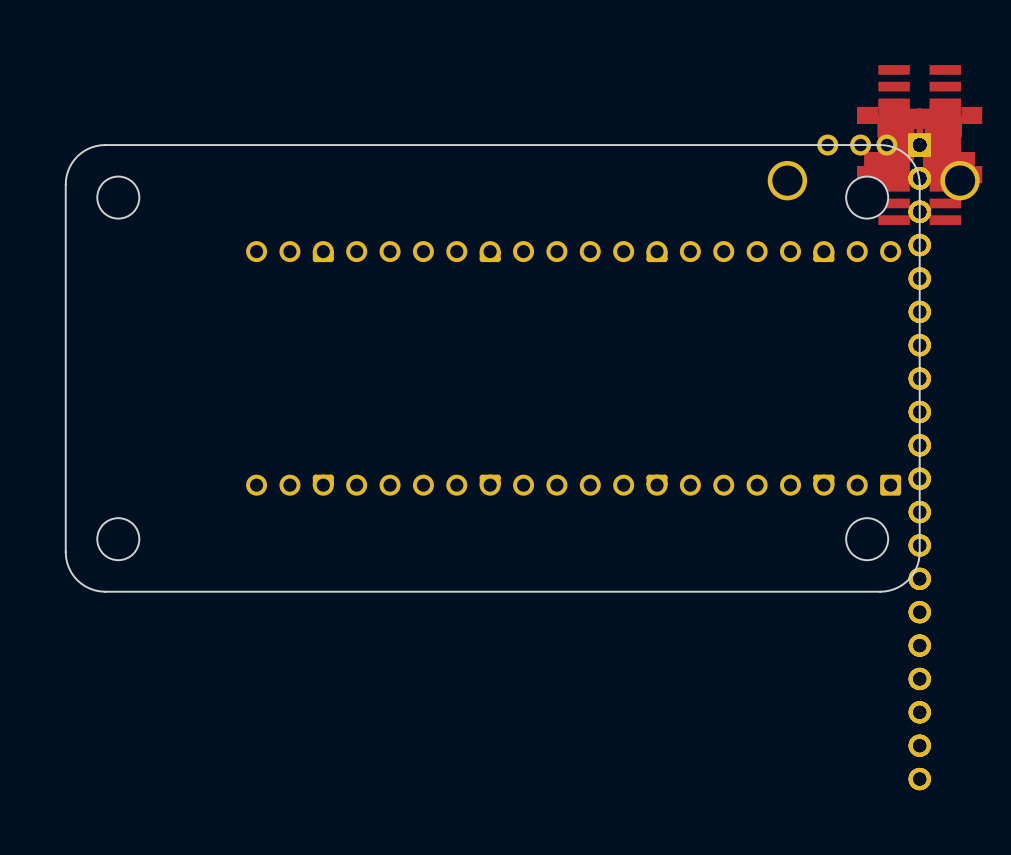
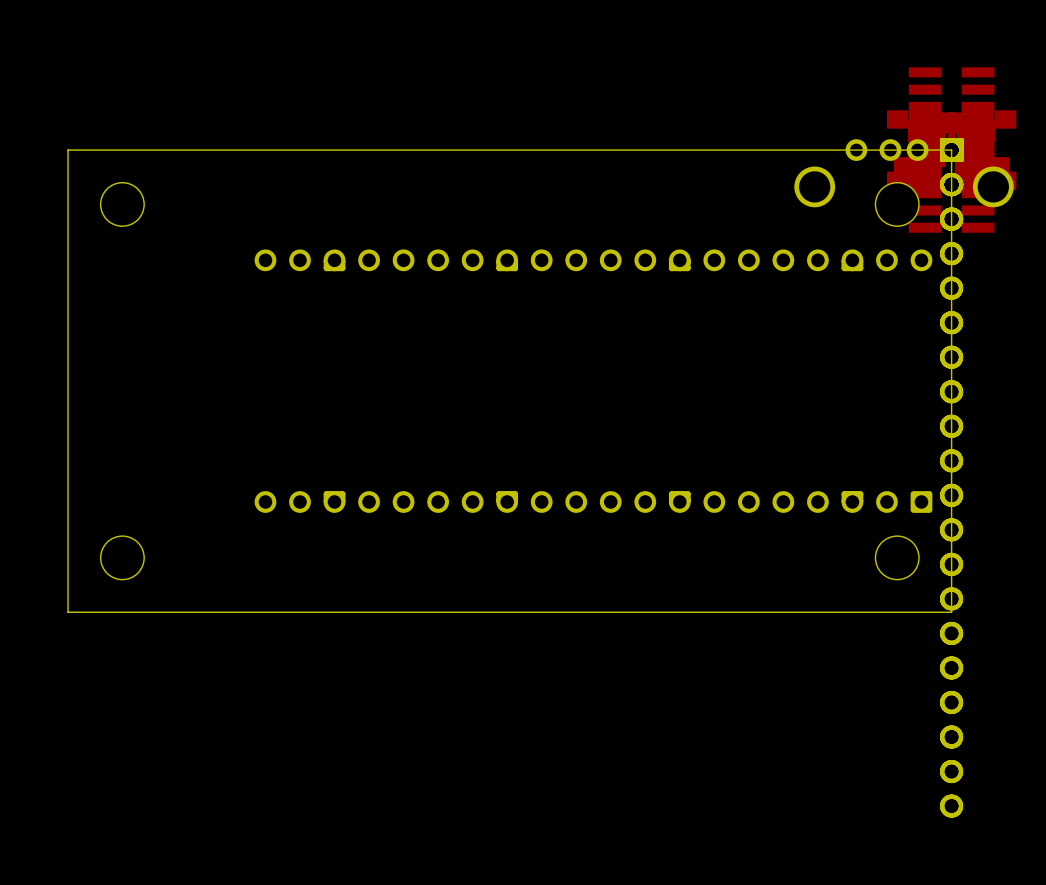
board edge: (105, 145) (92, 147) (77, 156) (67, 171) (65, 184) -> (108, 150) (68, 150) (68, 190)
board edge: (880, 145) (893, 147) (908, 156) (917, 171) (919, 184) -> (910, 150) (951, 150) (951, 190)
board edge: (65, 552) (68, 567) (77, 580) (90, 588) (105, 591) -> (68, 571) (68, 612) (108, 612)
board edge: (919, 552) (917, 565) (908, 580) (897, 587) (880, 591) -> (951, 571) (951, 612) (910, 612)

